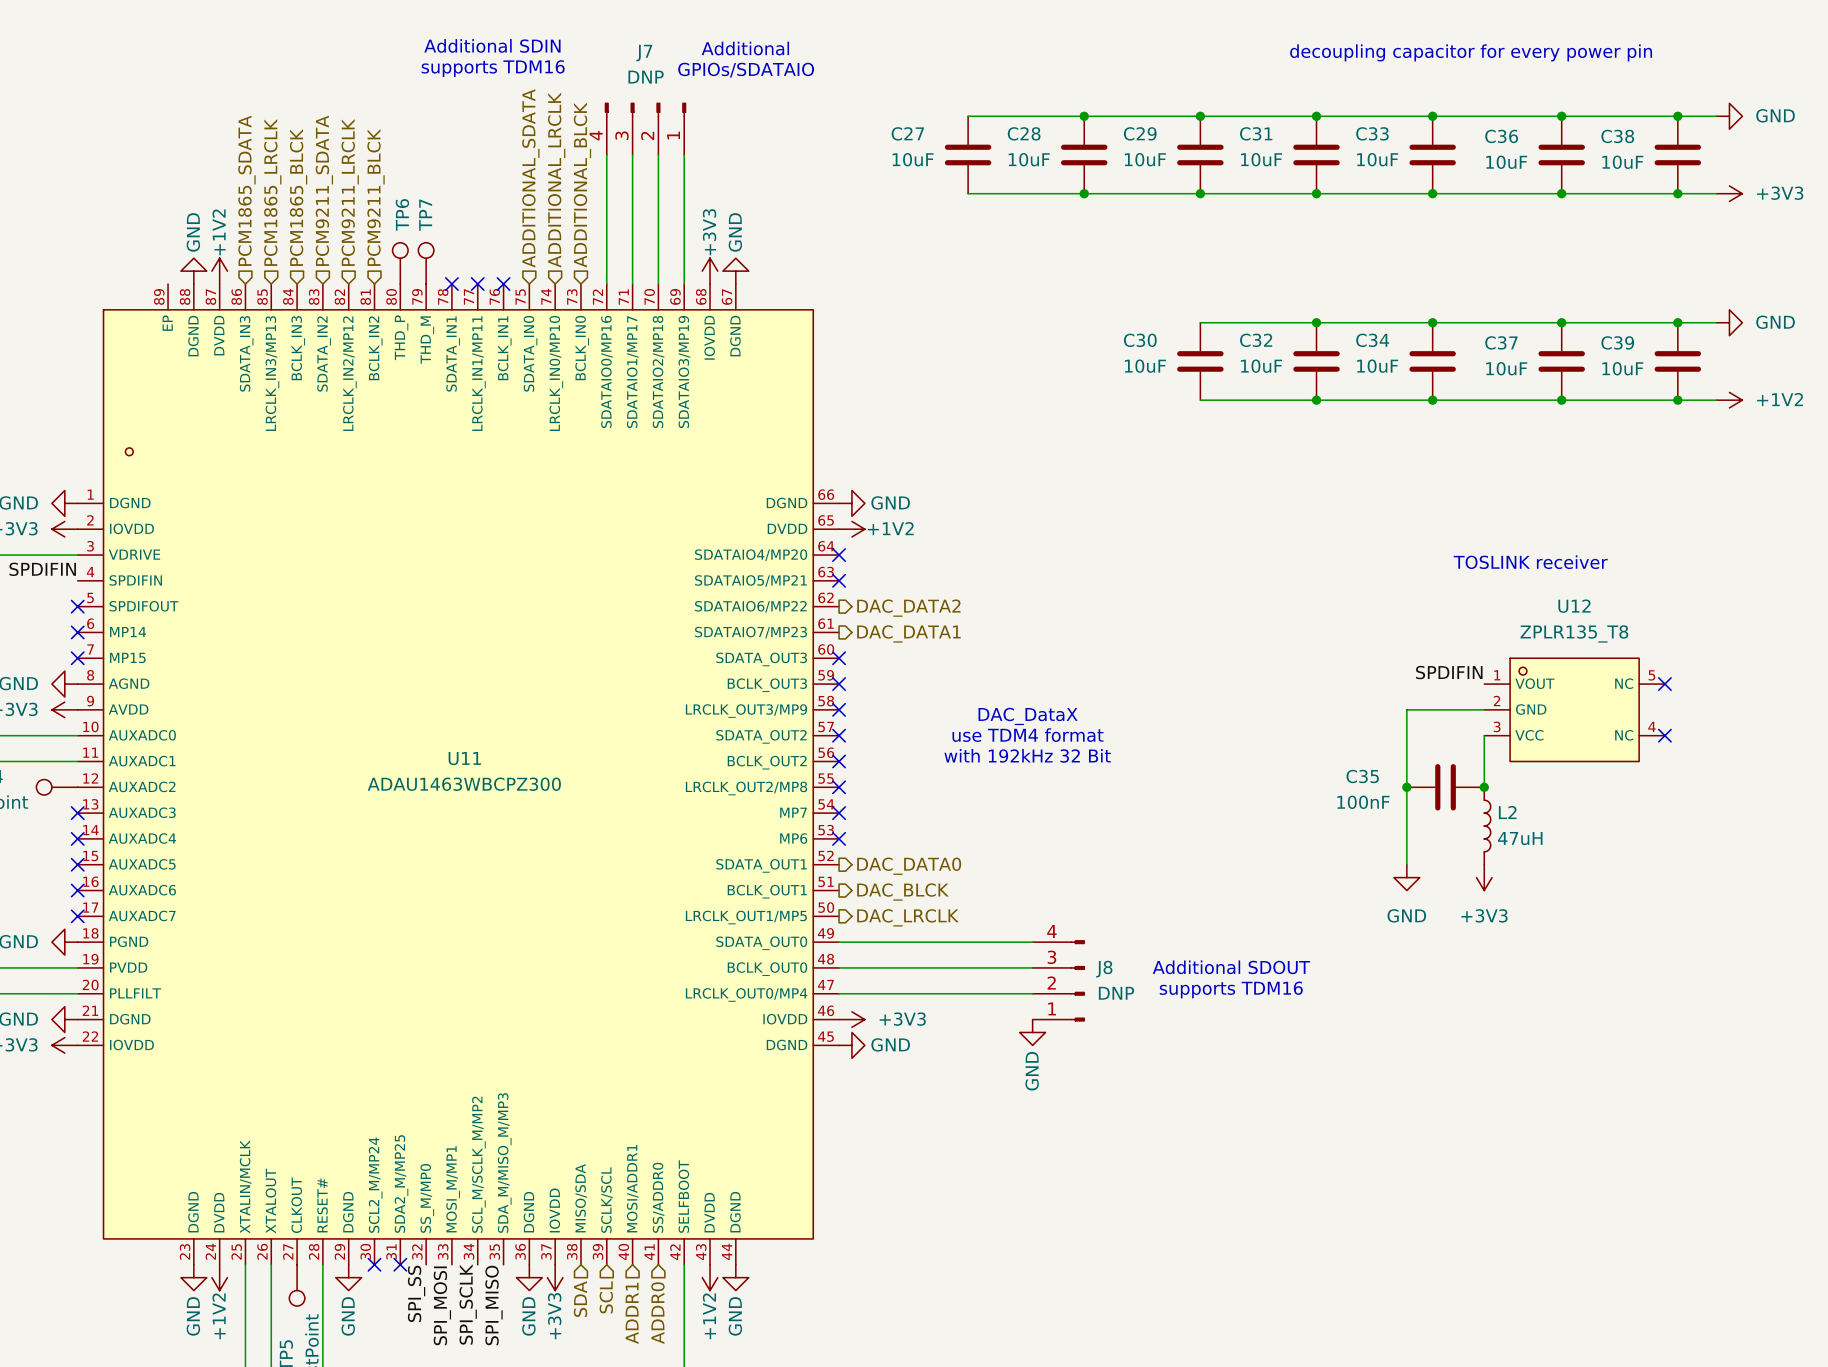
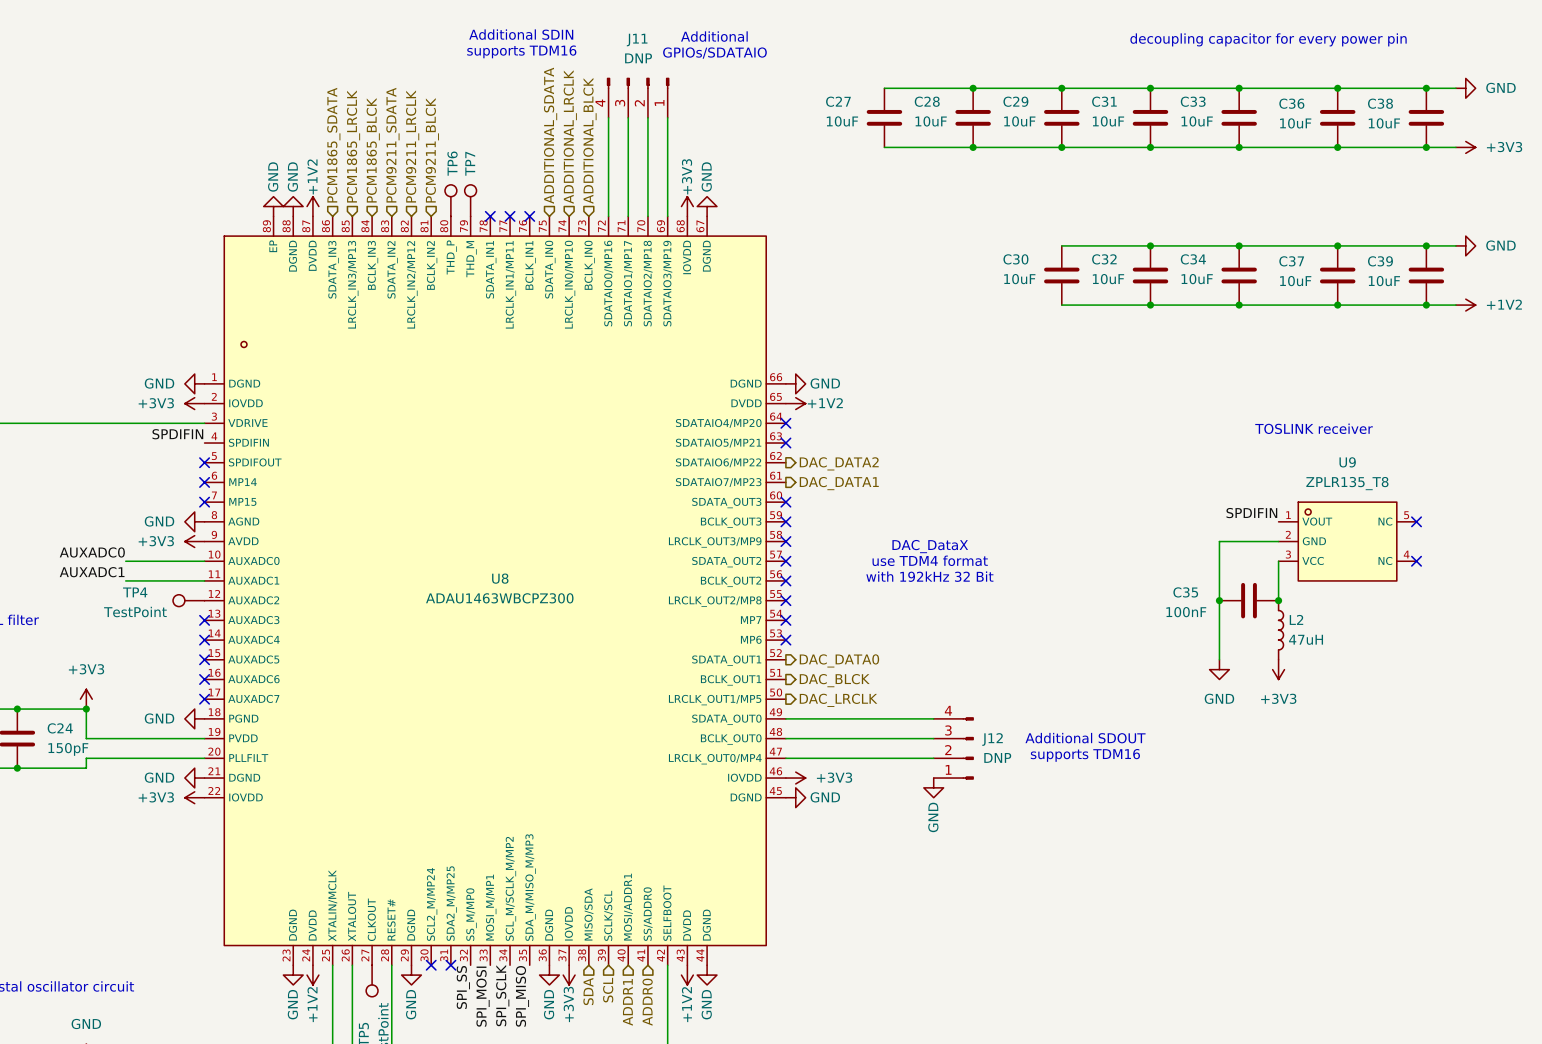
J7 name: J7 (644, 53) -> J11 (637, 40)
power symbol: none -> GND (273, 206)
U12 name: U12 (1574, 606) -> U9 (1347, 462)
U11 name: U11 (464, 758) -> U8 (500, 578)
J8 name: J8 (1104, 969) -> J12 (992, 739)

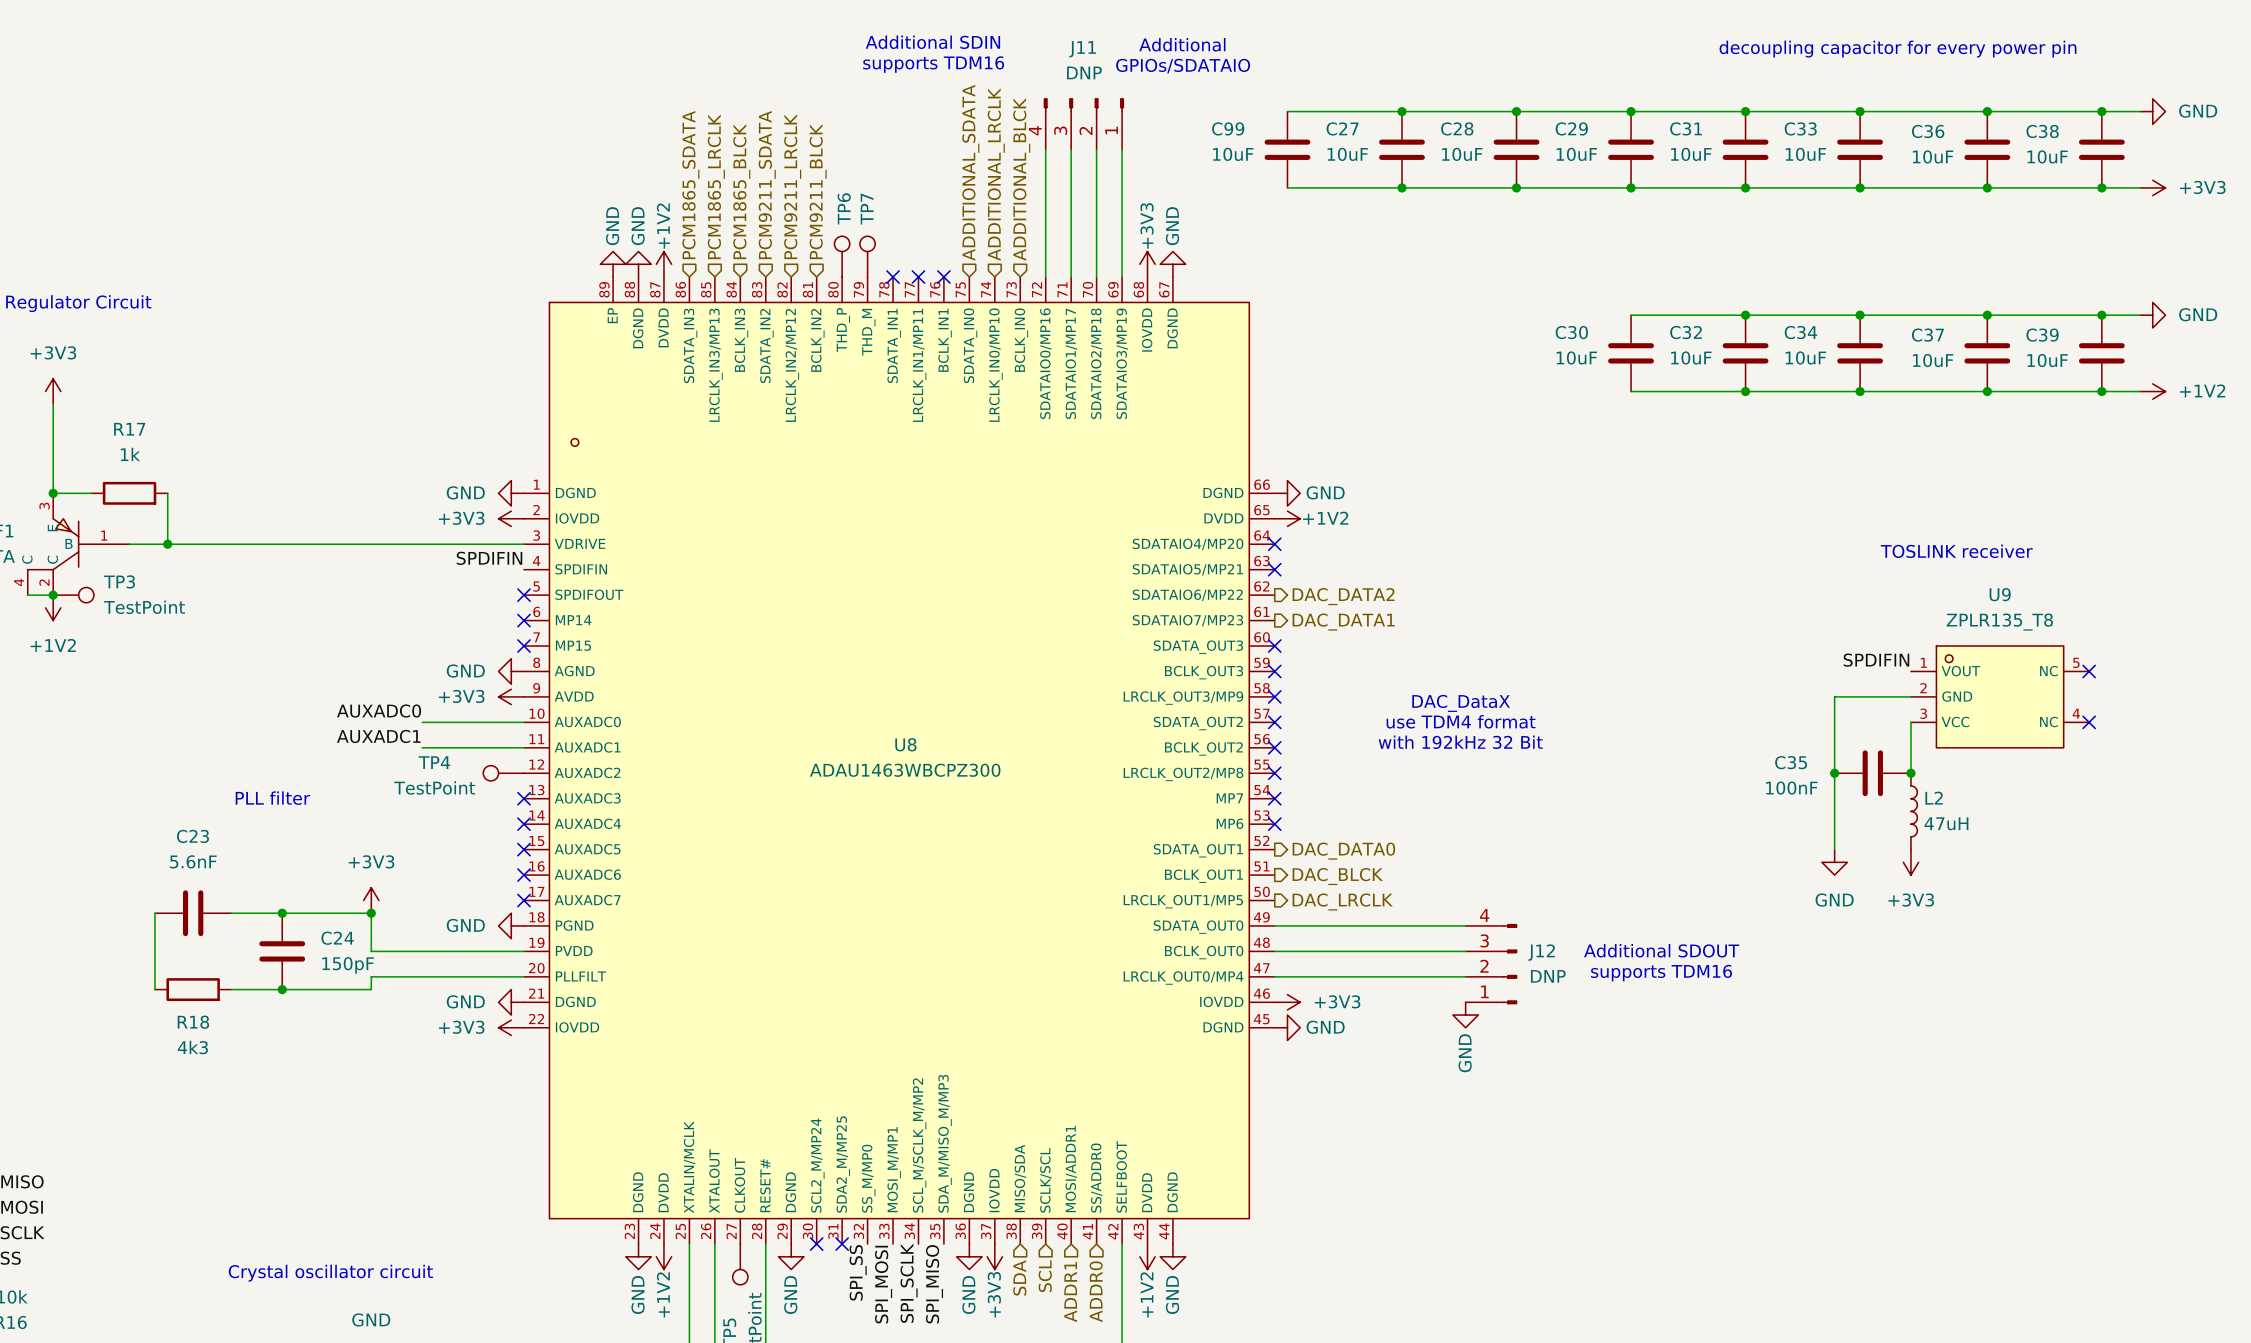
wire: none -> (1287, 111) (1402, 111)
junction: none -> (1402, 111)
C99: none -> 10uF (1287, 149)
wire: none -> (1287, 187) (1402, 187)
junction: none -> (1402, 187)

